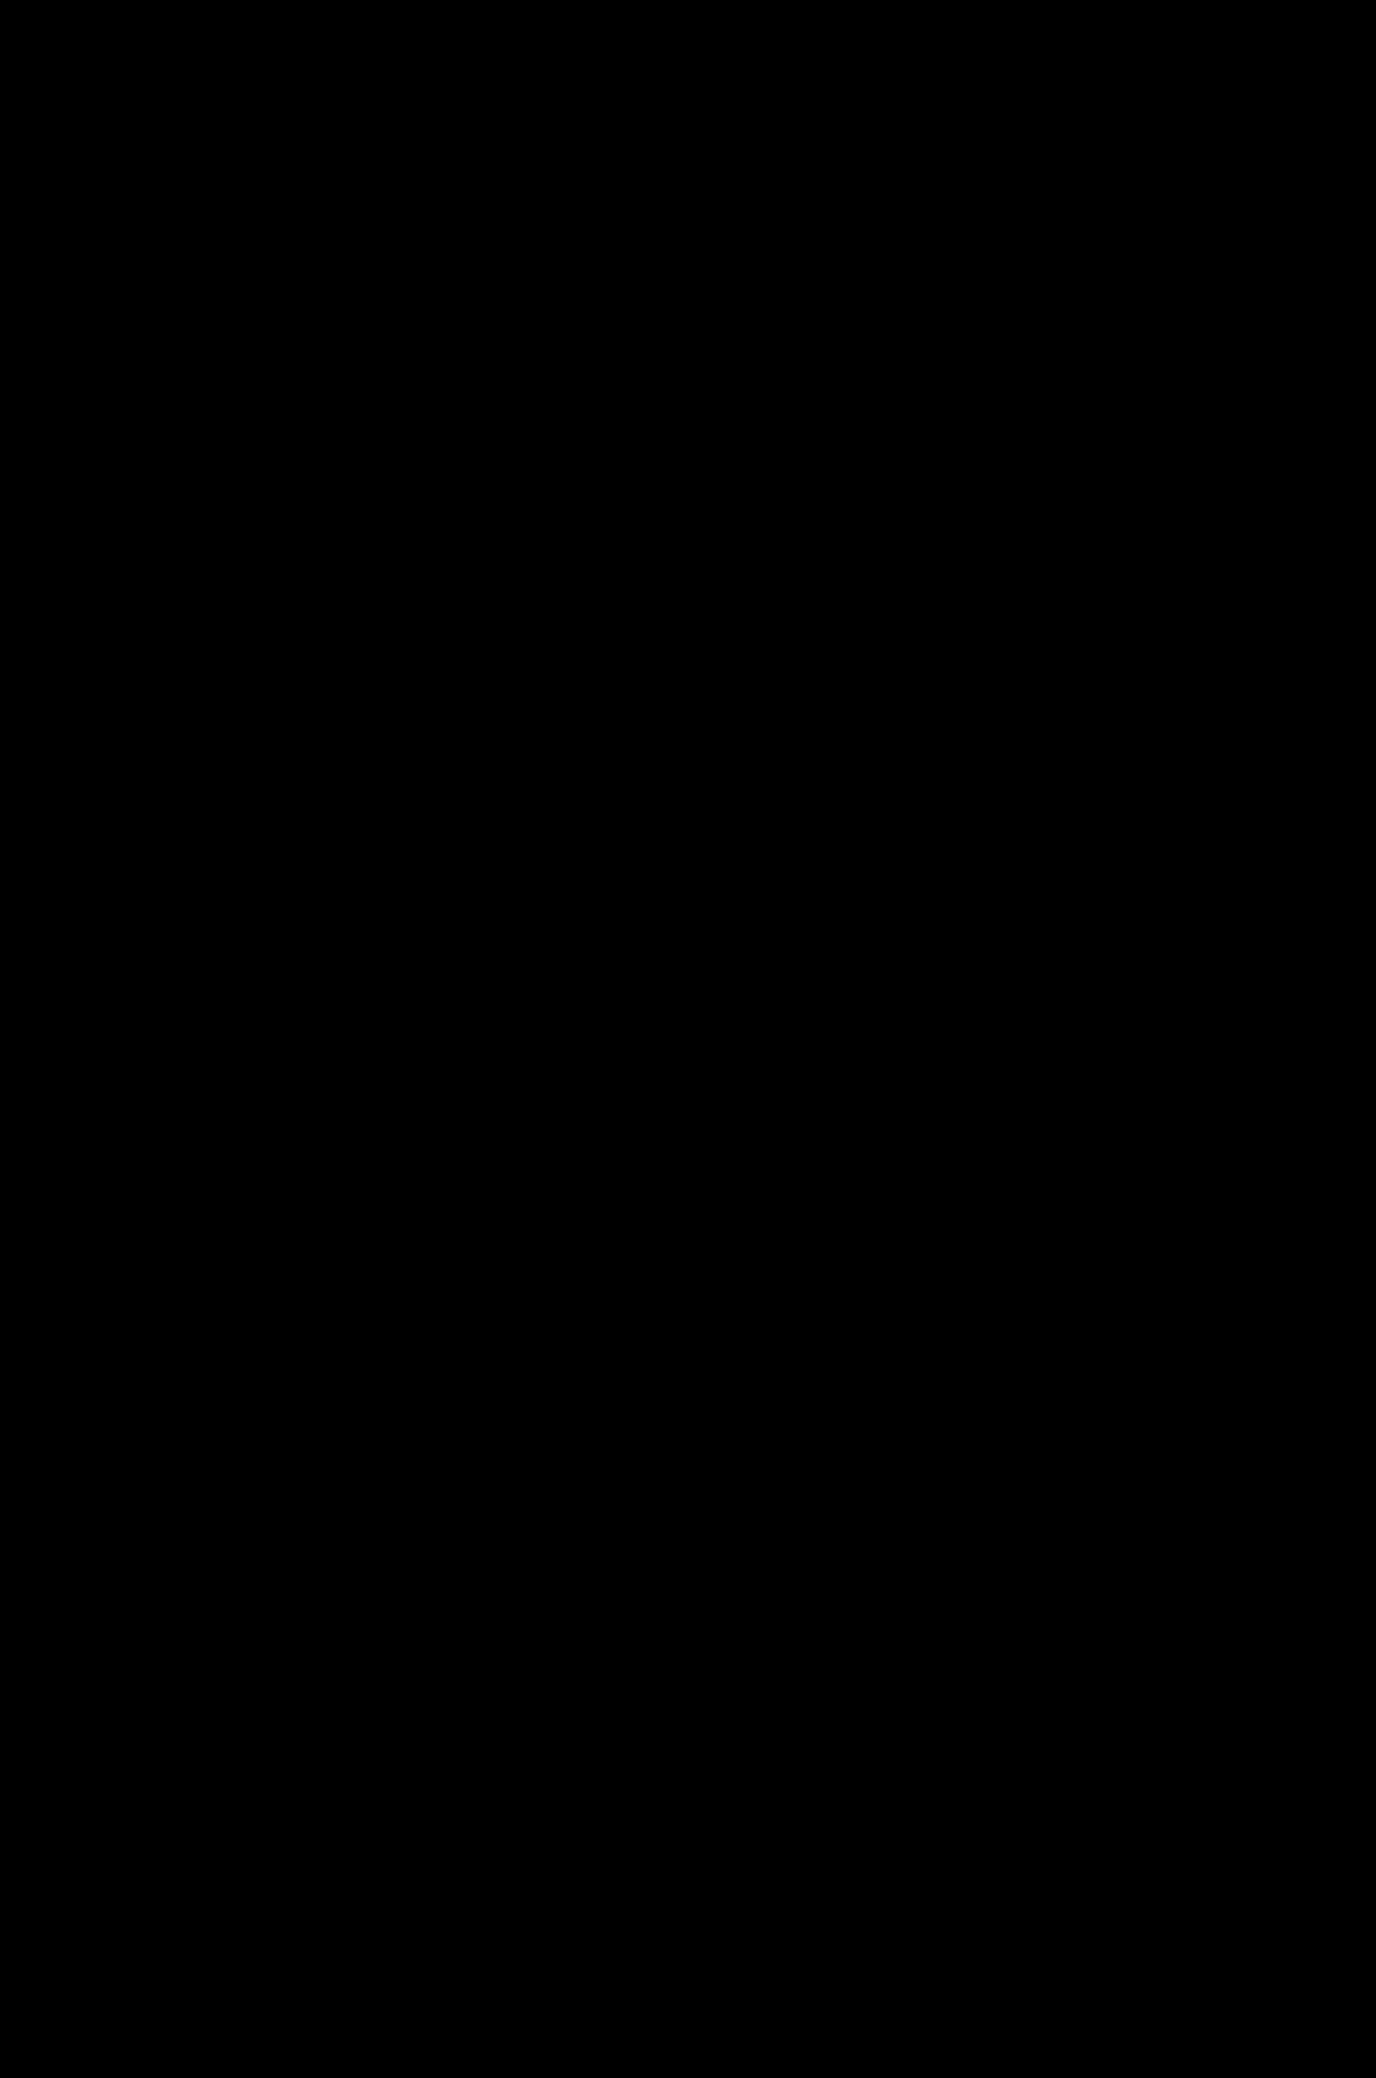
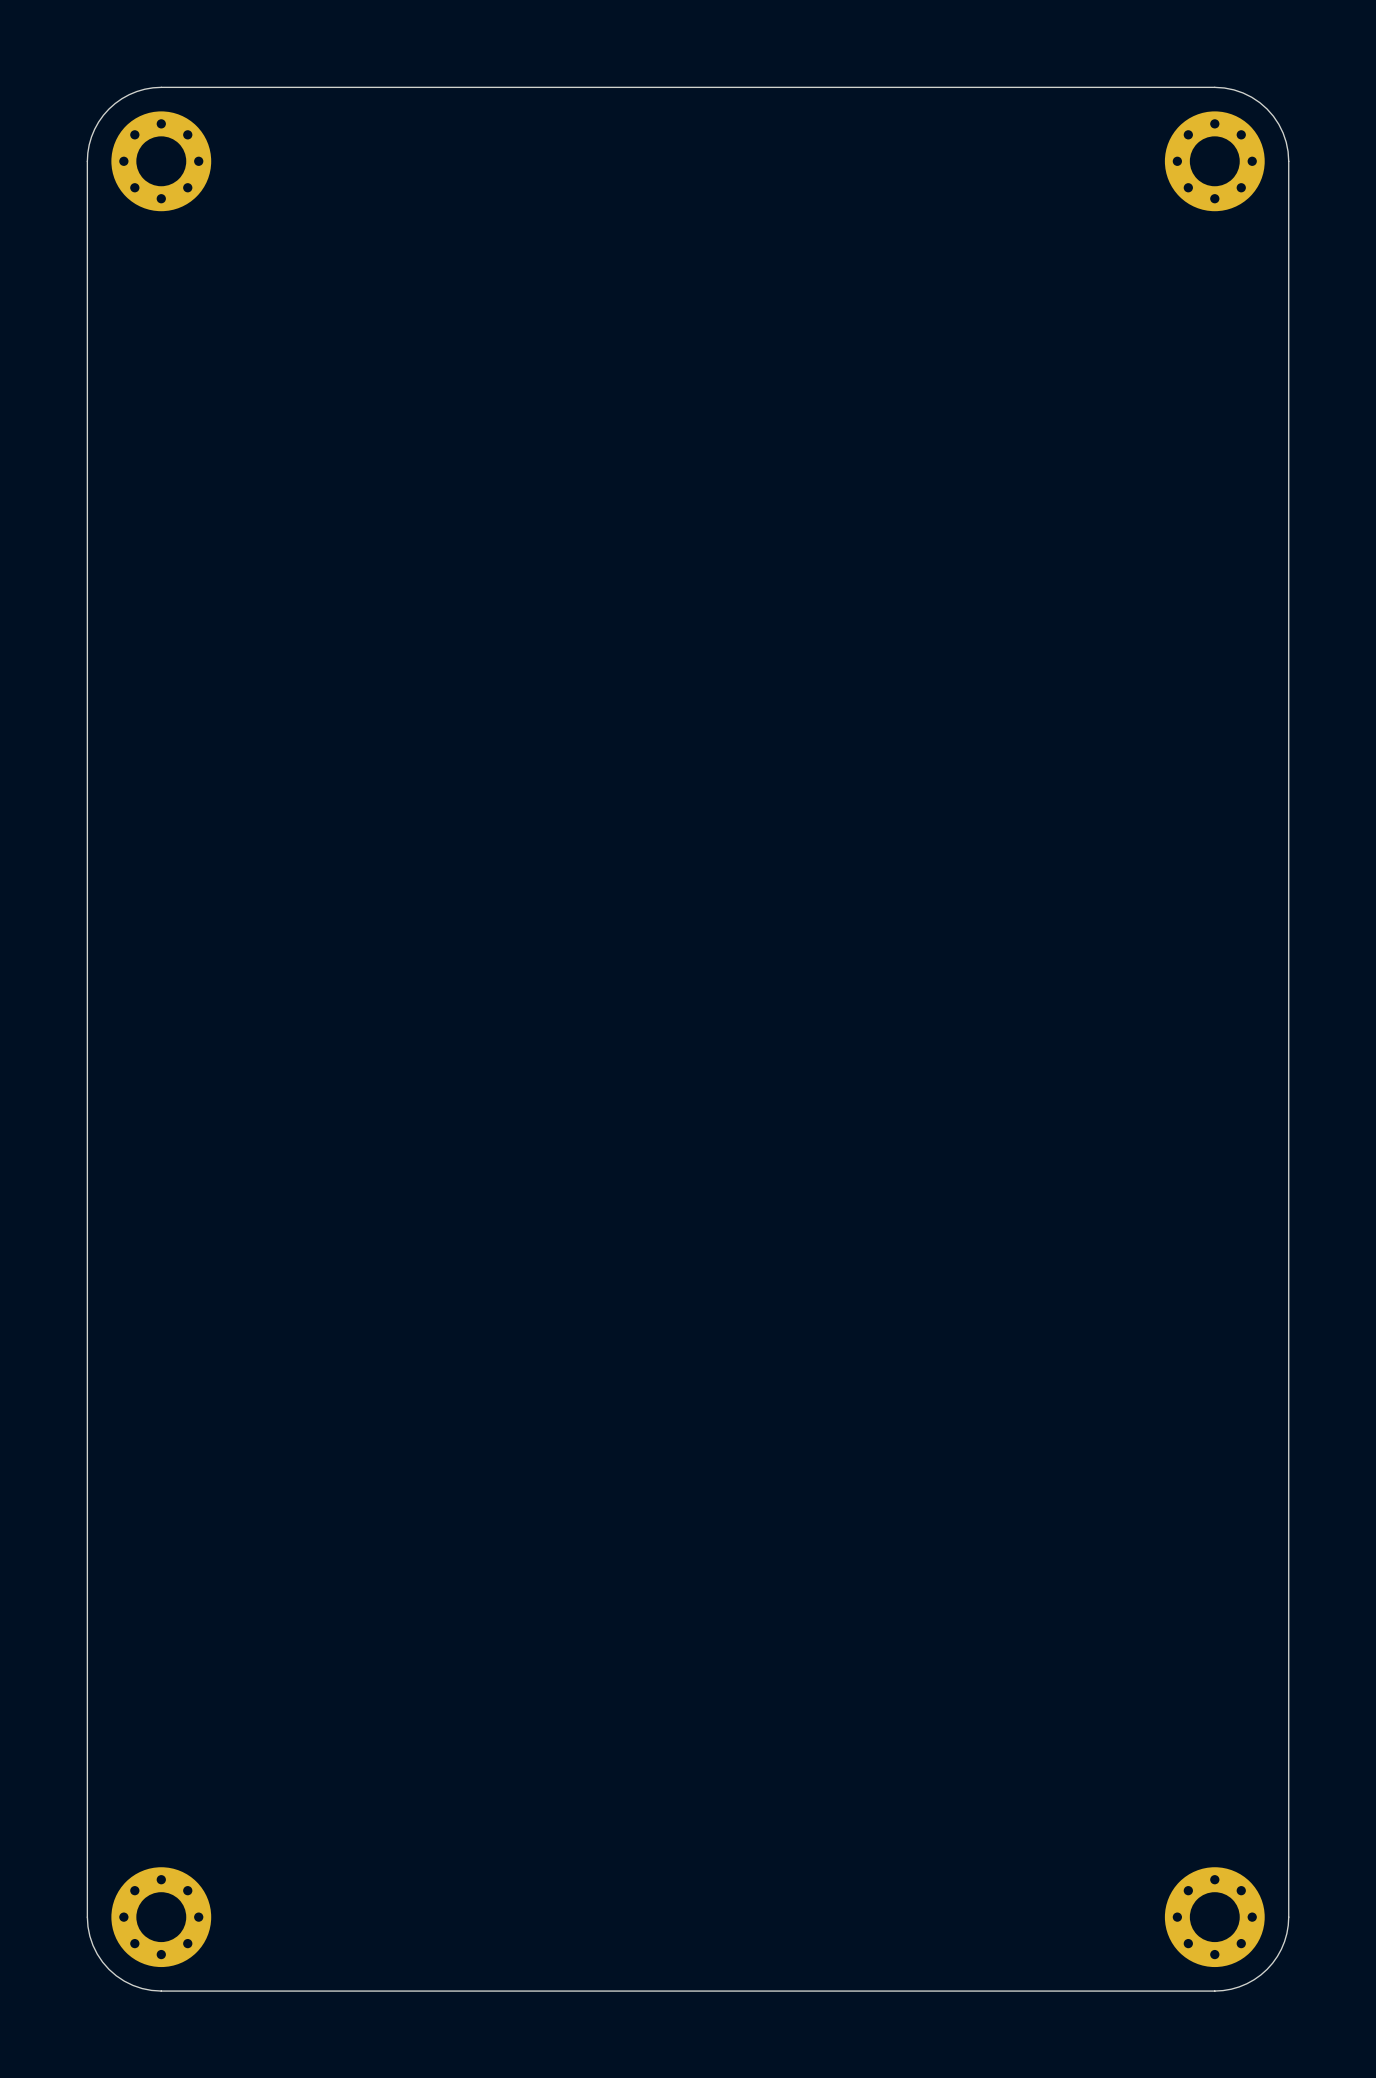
board edge: none -> (161, 87) (1214, 87) (1233, 89) (1251, 97) (1267, 109) (1278, 124) (1286, 142) (1288, 161) (1288, 1917) (1286, 1933) (1277, 1956) (1267, 1969) (1254, 1979) (1231, 1989) (1214, 1991) (161, 1991) (142, 1988) (124, 1981) (109, 1969) (97, 1954) (89, 1936) (87, 1917) (87, 161) (91, 136) (98, 121) (109, 109) (121, 98) (136, 91) (161, 87)
part: none -> (161, 161)
part: none -> (1214, 161)
part: none -> (161, 1917)
part: none -> (1214, 1917)

